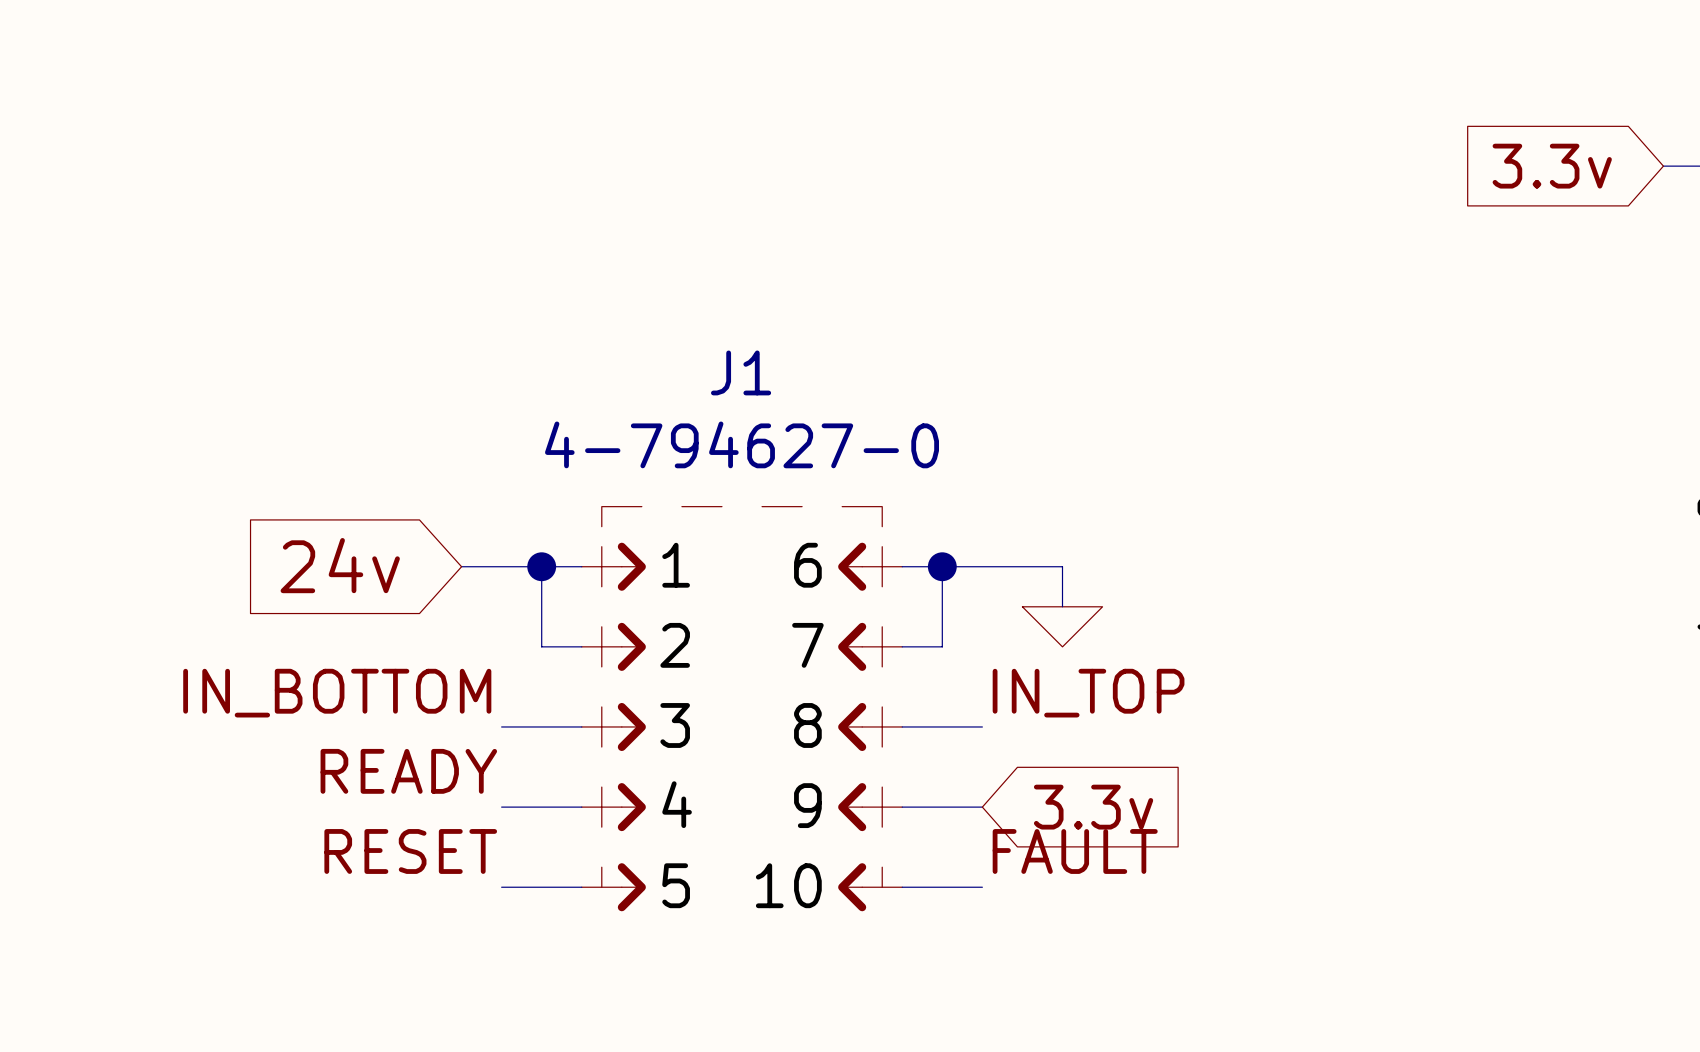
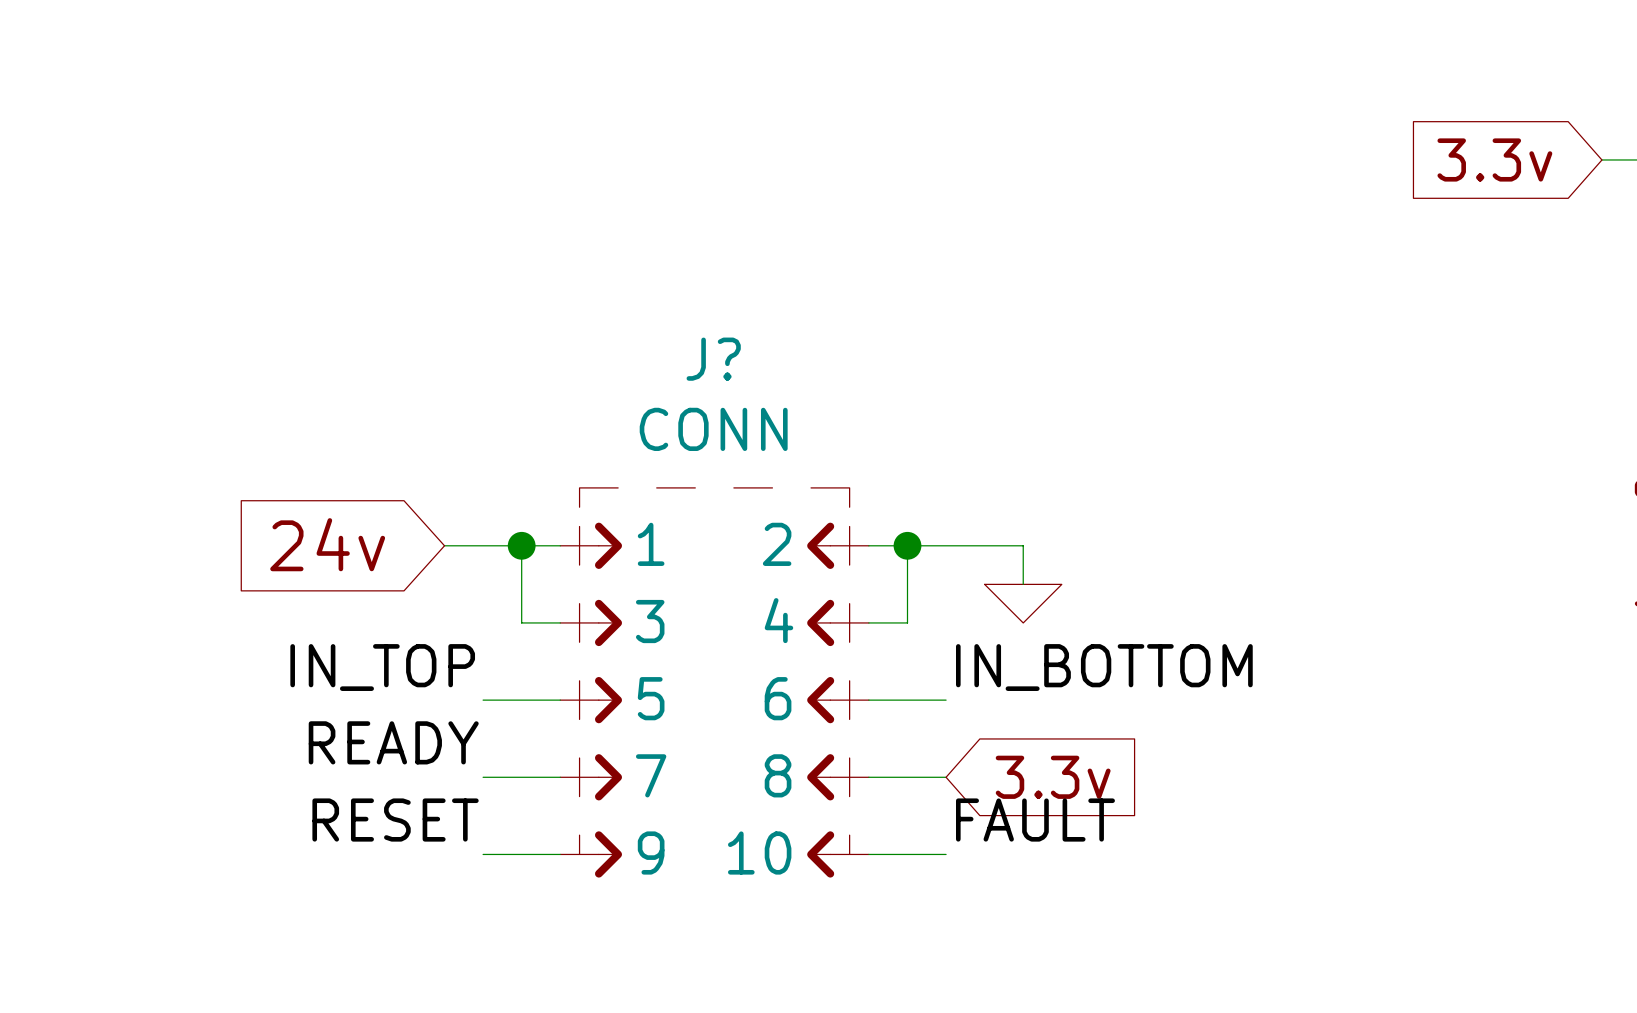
J1 name: J1 (741, 372) -> J? (713, 359)
J1 value: 4-794627-0 (742, 444) -> CONN (713, 429)
J1 pin name: 6 (807, 565) -> 2 (777, 544)
J1 pin name: 2 (675, 645) -> 3 (650, 621)
J1 pin name: 7 (807, 645) -> 4 (778, 620)
label: IN_BOTTOM (337, 693) -> IN_TOP (382, 667)
label: IN_TOP (1088, 693) -> IN_BOTTOM (1104, 667)
J1 pin name: 3 (675, 725) -> 5 (651, 698)
J1 pin name: 8 (807, 725) -> 6 (778, 698)
J1 pin name: 4 (677, 804) -> 7 (651, 775)
J1 pin name: 9 (807, 805) -> 8 (778, 775)
J1 pin name: 5 (676, 885) -> 9 (651, 853)

